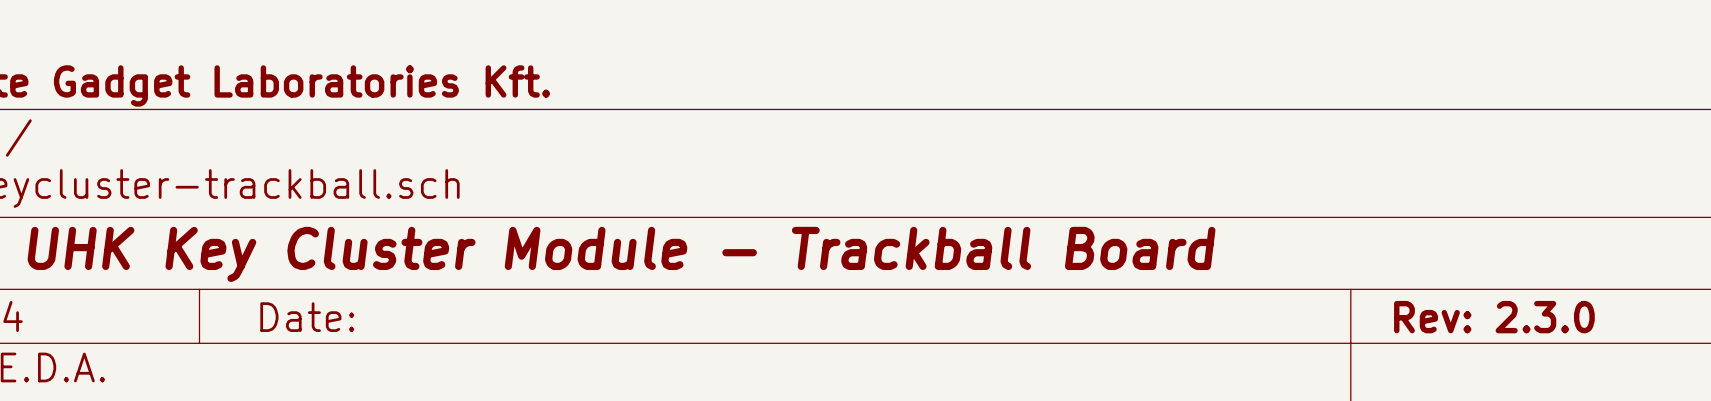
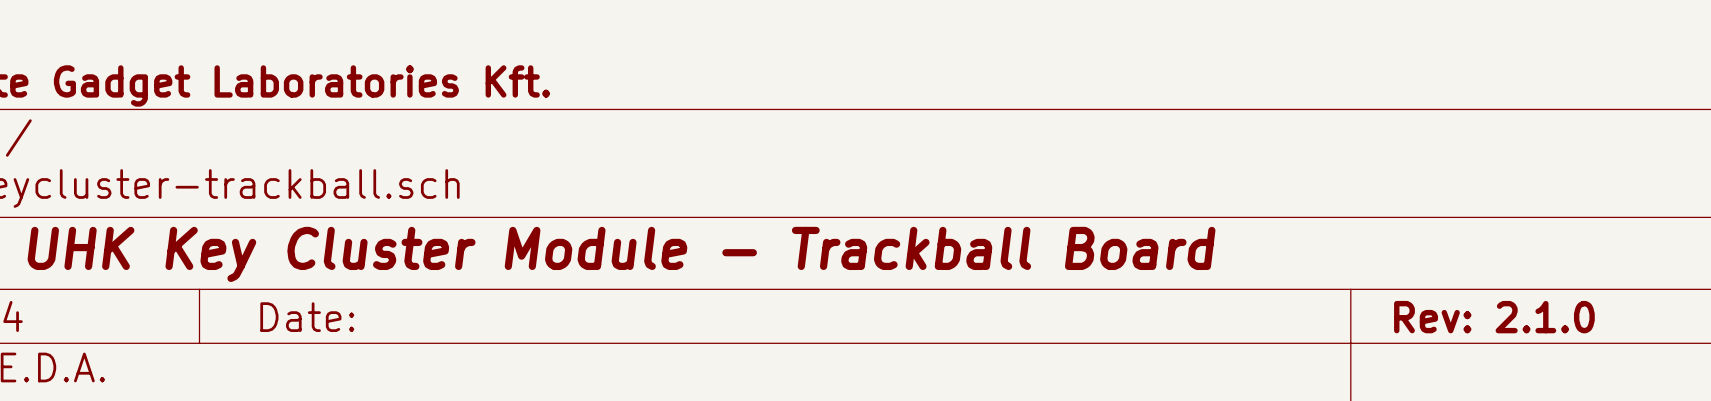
title block: Rev: 2.3.0 (1494, 317) -> Rev: 2.1.0 (1494, 317)

